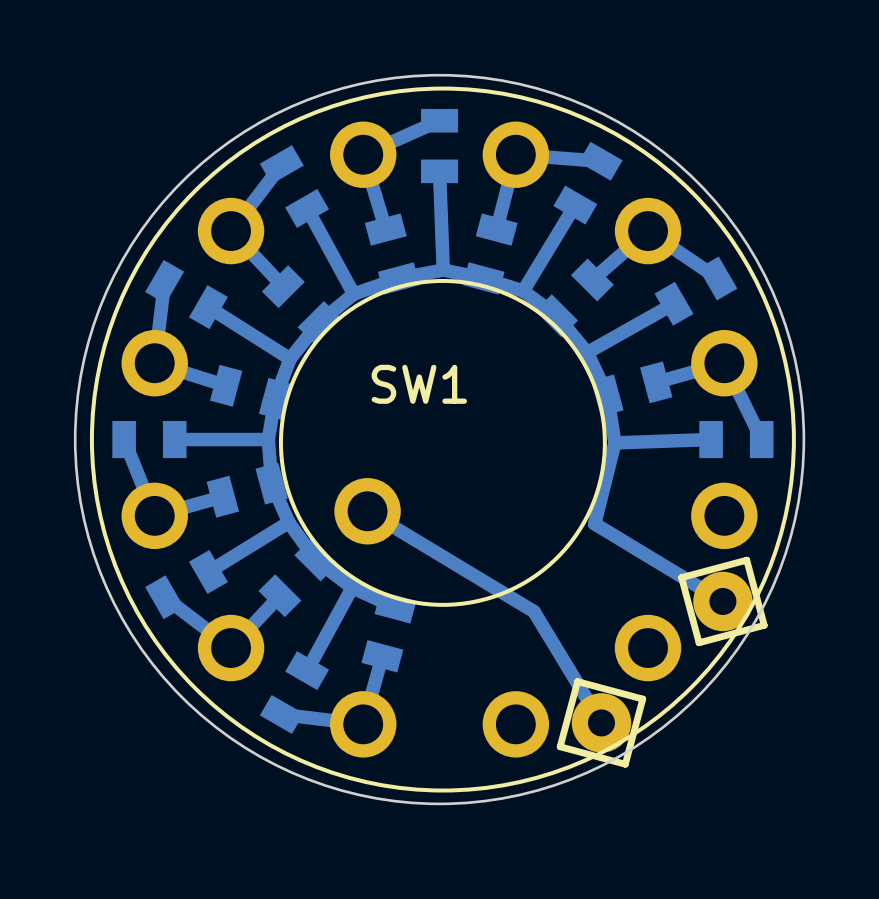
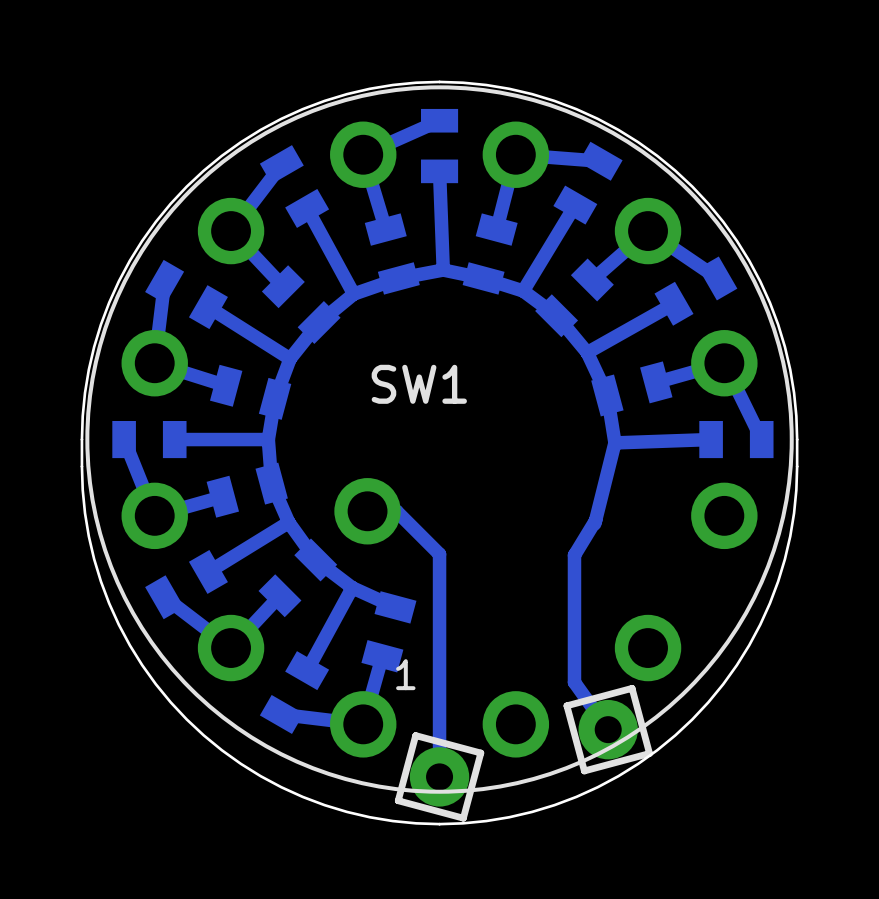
round board edge: [73, 73, 806, 806] -> none
board edge: none -> (439, 81) (416, 82) (369, 88) (346, 94) (302, 109) (260, 129) (240, 142) (221, 155) (186, 186) (155, 221) (142, 240) (118, 281) (109, 302) (94, 346) (88, 369) (82, 416) (81, 439) (85, 513) (88, 536) (100, 581) (109, 603) (129, 645) (155, 684) (170, 702) (186, 719) (221, 750) (260, 776) (302, 796) (346, 811) (369, 817) (416, 823) (439, 824) (462, 823) (509, 817) (532, 811) (576, 796) (597, 787) (638, 763) (657, 750) (692, 719) (723, 684) (736, 665) (749, 645) (769, 603) (784, 559) (790, 536) (796, 489) (797, 466) (794, 392) (784, 346) (778, 324) (760, 281) (749, 260) (723, 221) (708, 203) (675, 170) (657, 155) (618, 129) (576, 109) (554, 100) (509, 88) (462, 82) (439, 81)
SW1 footprint: [89, 86, 796, 793] -> [85, 85, 794, 794]
bottom track: (367, 511) (534, 611) (601, 722) -> (367, 511) (396, 511) (439, 554) (439, 776)
bottom track: none -> (595, 520) (574, 555) (574, 682) (608, 729)
bottom track: (594, 523) (722, 601) -> none
part: (722, 601) -> none
part rotation: 0° (601, 722) -> 30° counterclockwise (608, 729)
part: none -> (439, 776)

